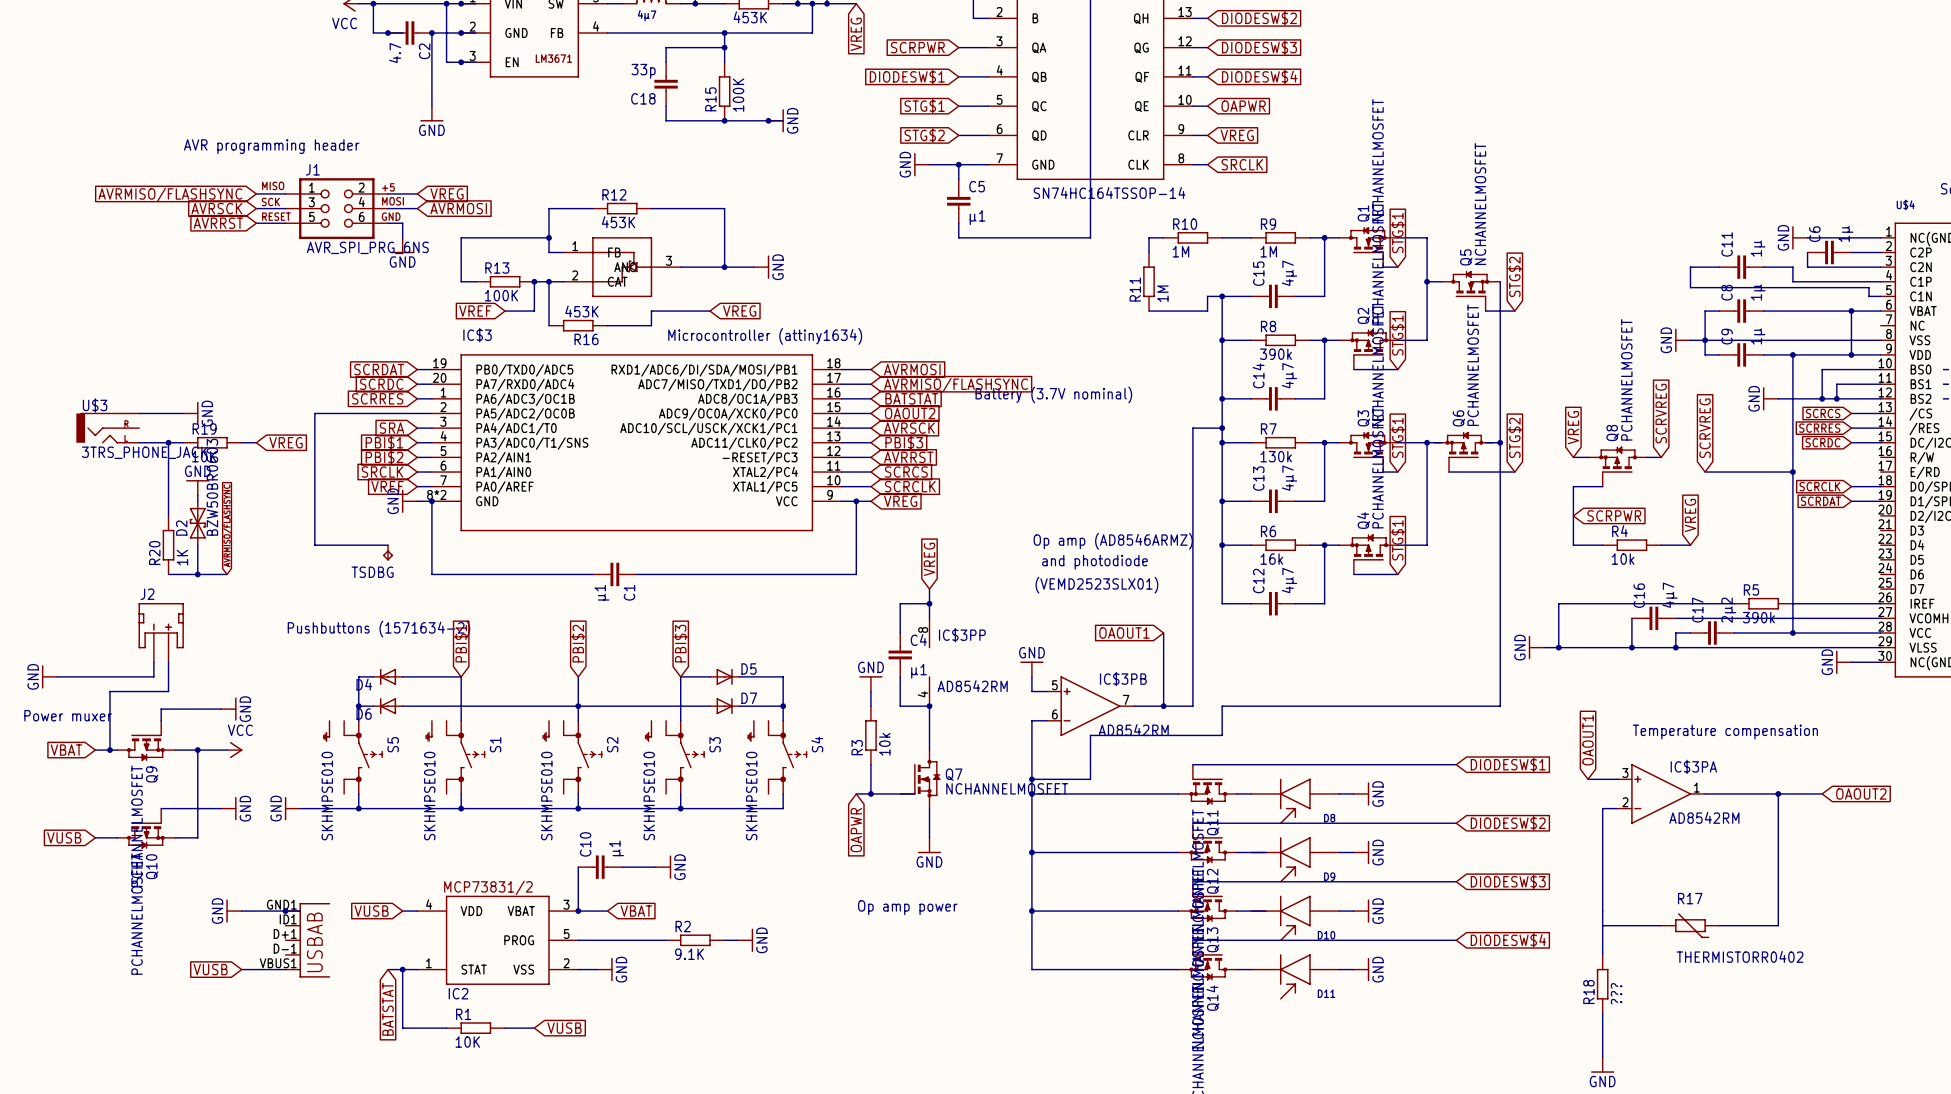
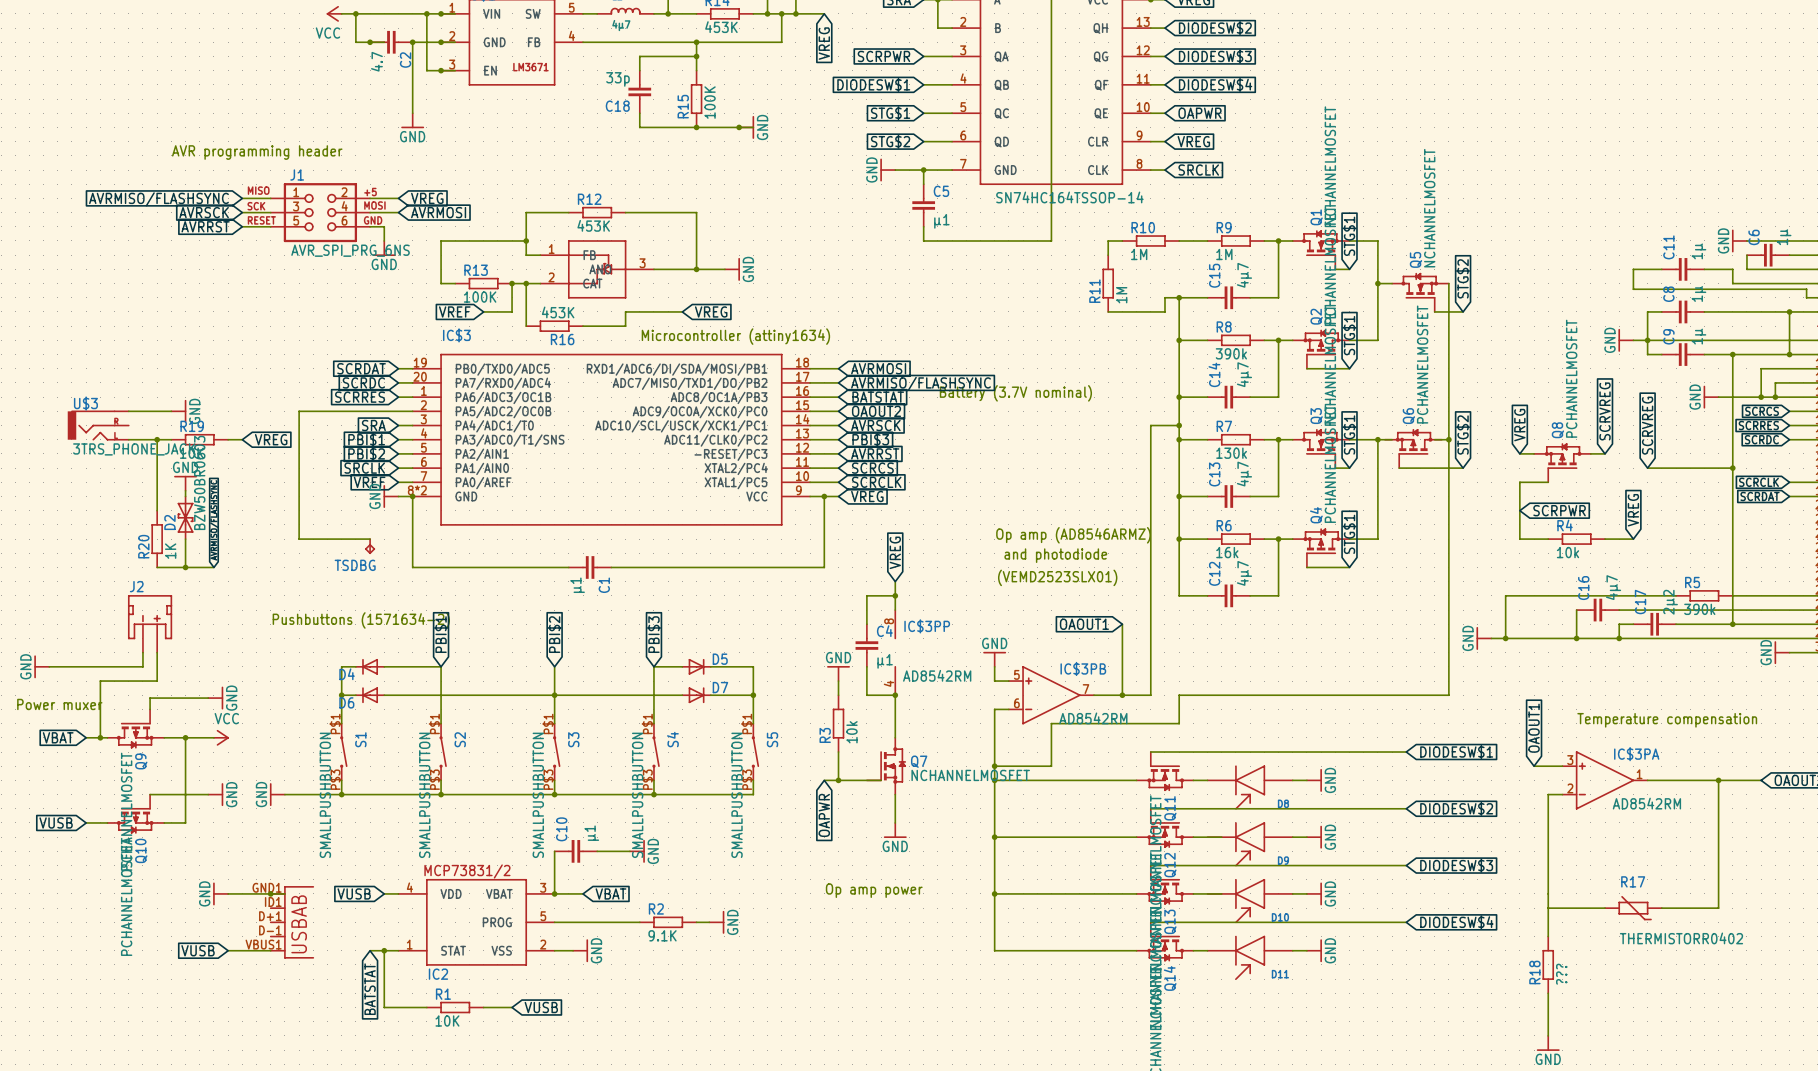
S5 symbol: [323, 720, 383, 794] -> [751, 723, 760, 781]
S1 symbol: [425, 720, 486, 794] -> [340, 723, 348, 781]
S2 symbol: [542, 720, 603, 794] -> [439, 723, 447, 781]
S3 symbol: [645, 720, 705, 794] -> [553, 723, 561, 781]
S4 symbol: [747, 720, 808, 794] -> [652, 723, 660, 781]
S5 name position: S5 (393, 744) -> S5 (772, 739)
S1 name position: S1 (495, 744) -> S1 (360, 739)
S2 name position: S2 (612, 744) -> S2 (460, 739)
S3 name position: S3 (715, 744) -> S3 (573, 739)
S4 name position: S4 (817, 744) -> S4 (672, 739)
S5 value: SKHMPSE010 (327, 796) -> SMALLPUSHBUTTON (737, 795)
S1 value: SKHMPSE010 (429, 796) -> SMALLPUSHBUTTON (325, 795)
S2 value: SKHMPSE010 (546, 796) -> SMALLPUSHBUTTON (424, 795)
S3 value: SKHMPSE010 (649, 796) -> SMALLPUSHBUTTON (538, 795)
S4 value: SKHMPSE010 (751, 796) -> SMALLPUSHBUTTON (637, 795)

